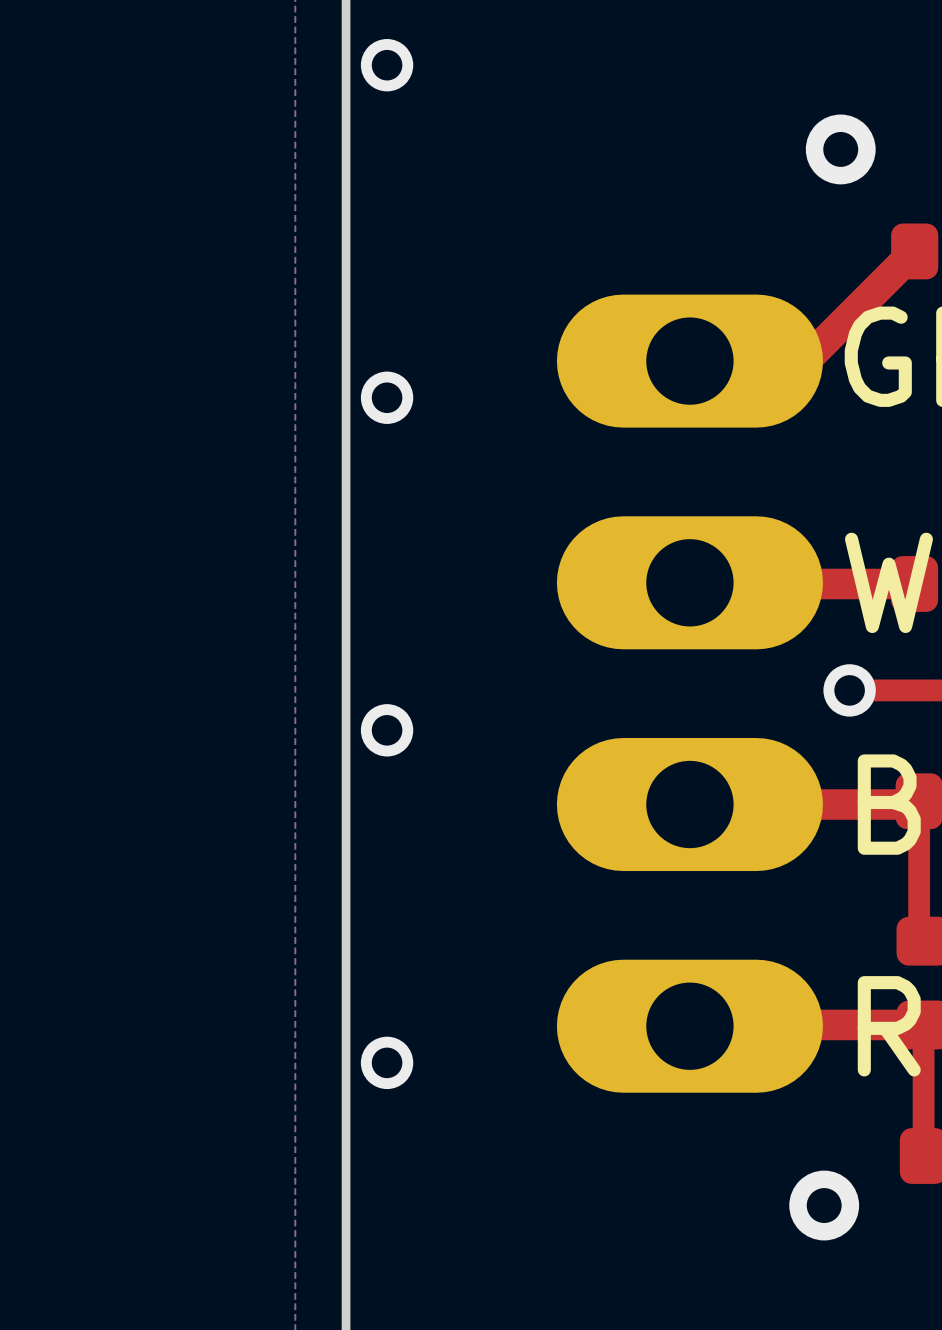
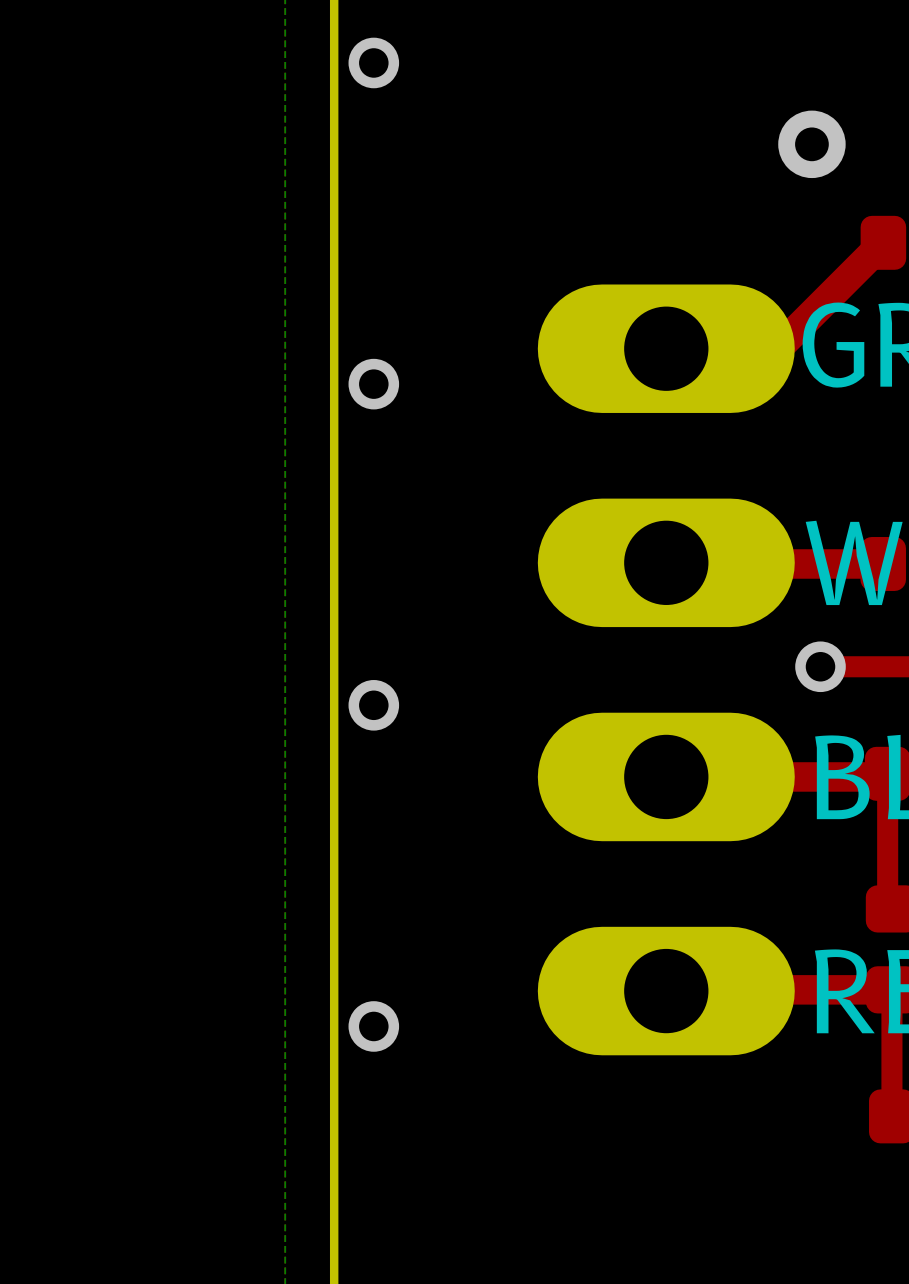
via: (824, 1205) -> none

